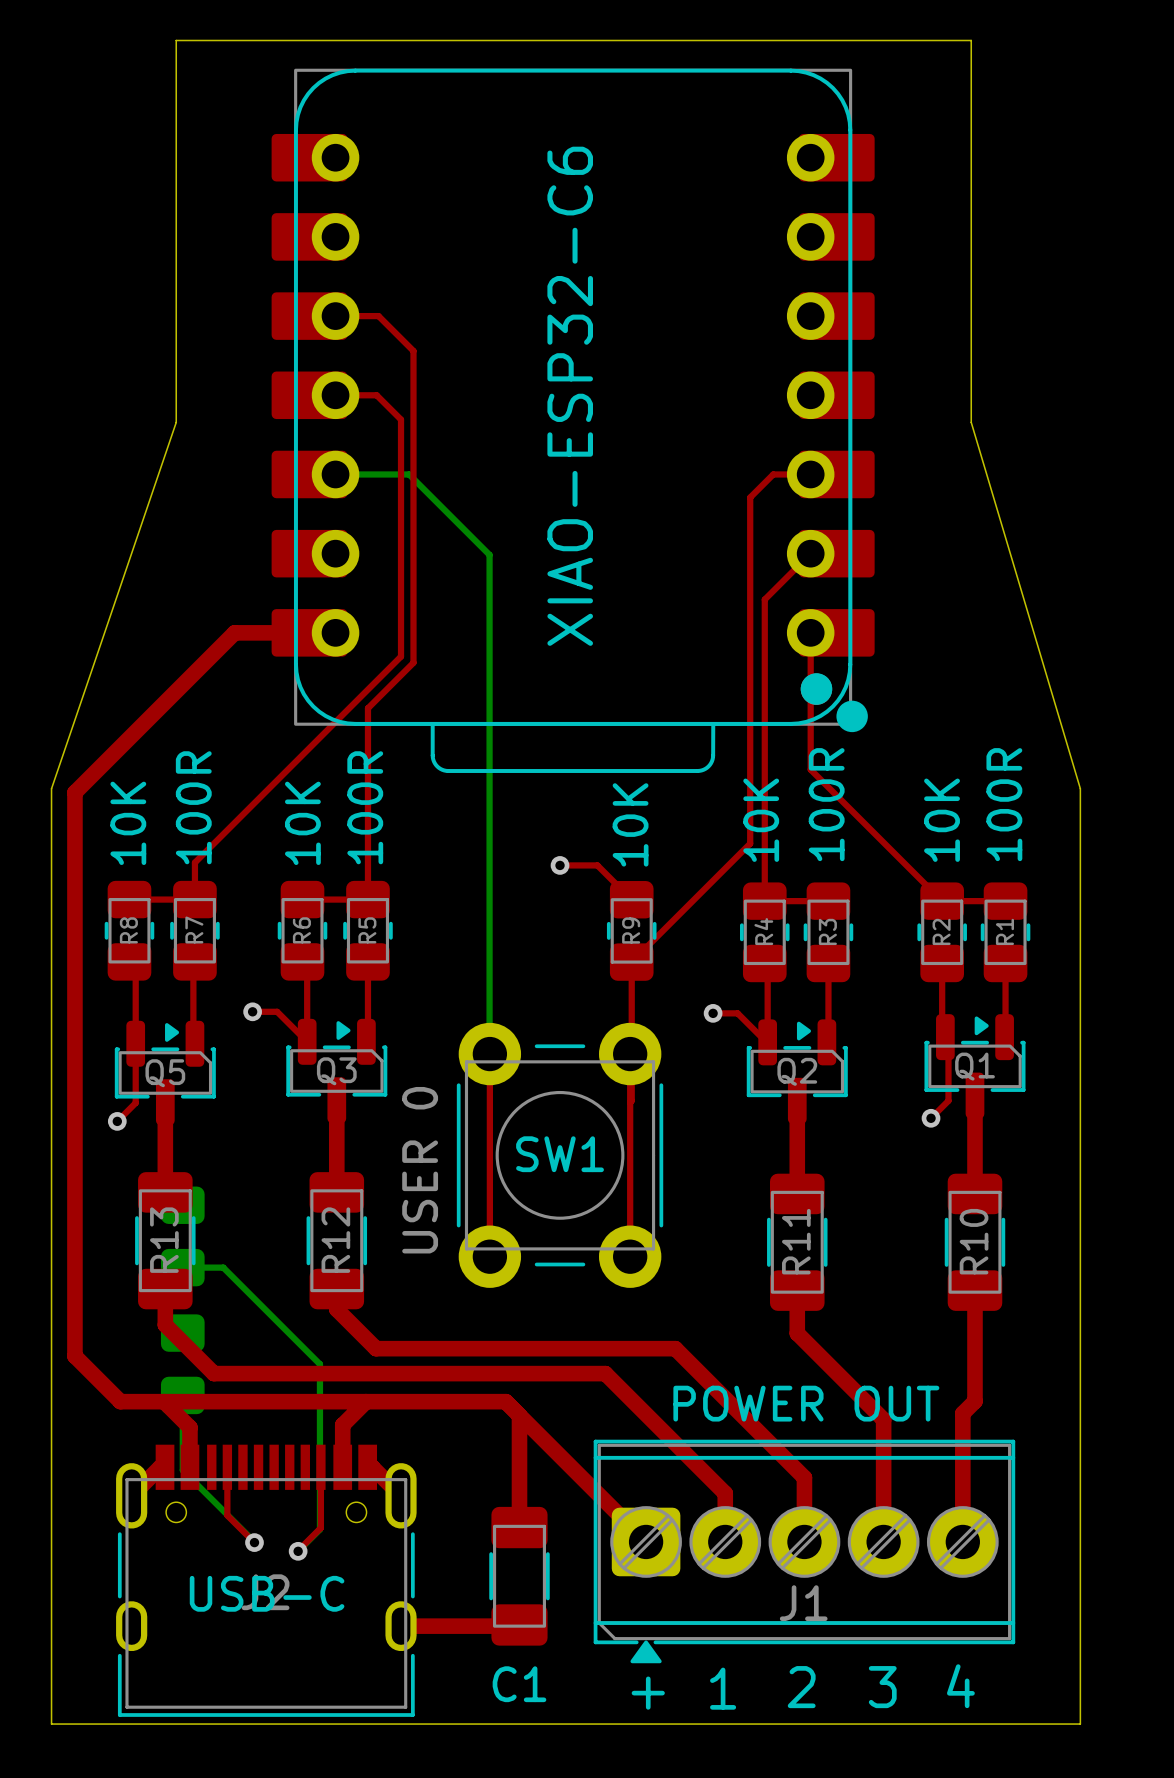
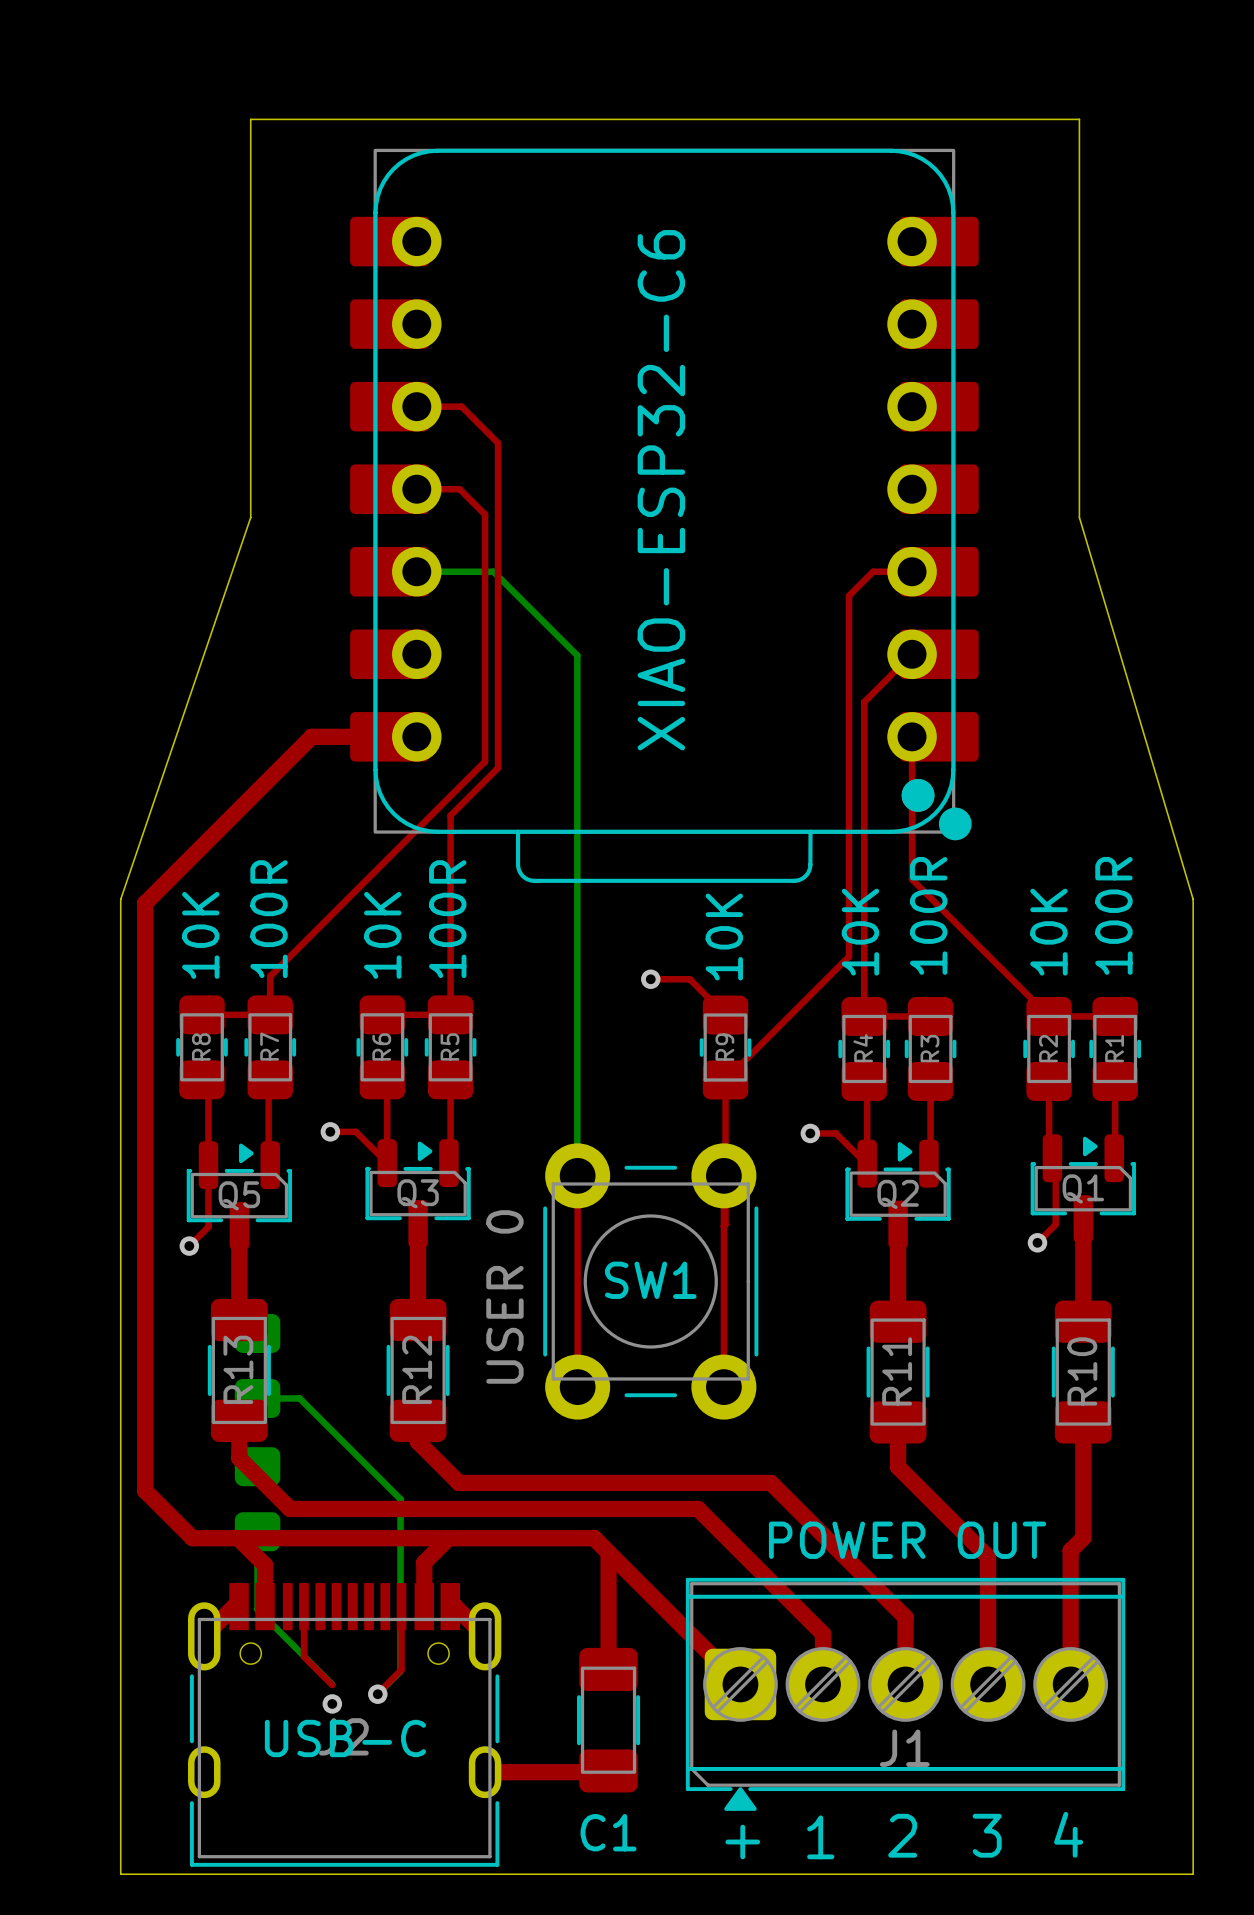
via position: (254, 1542) -> (332, 1703)

